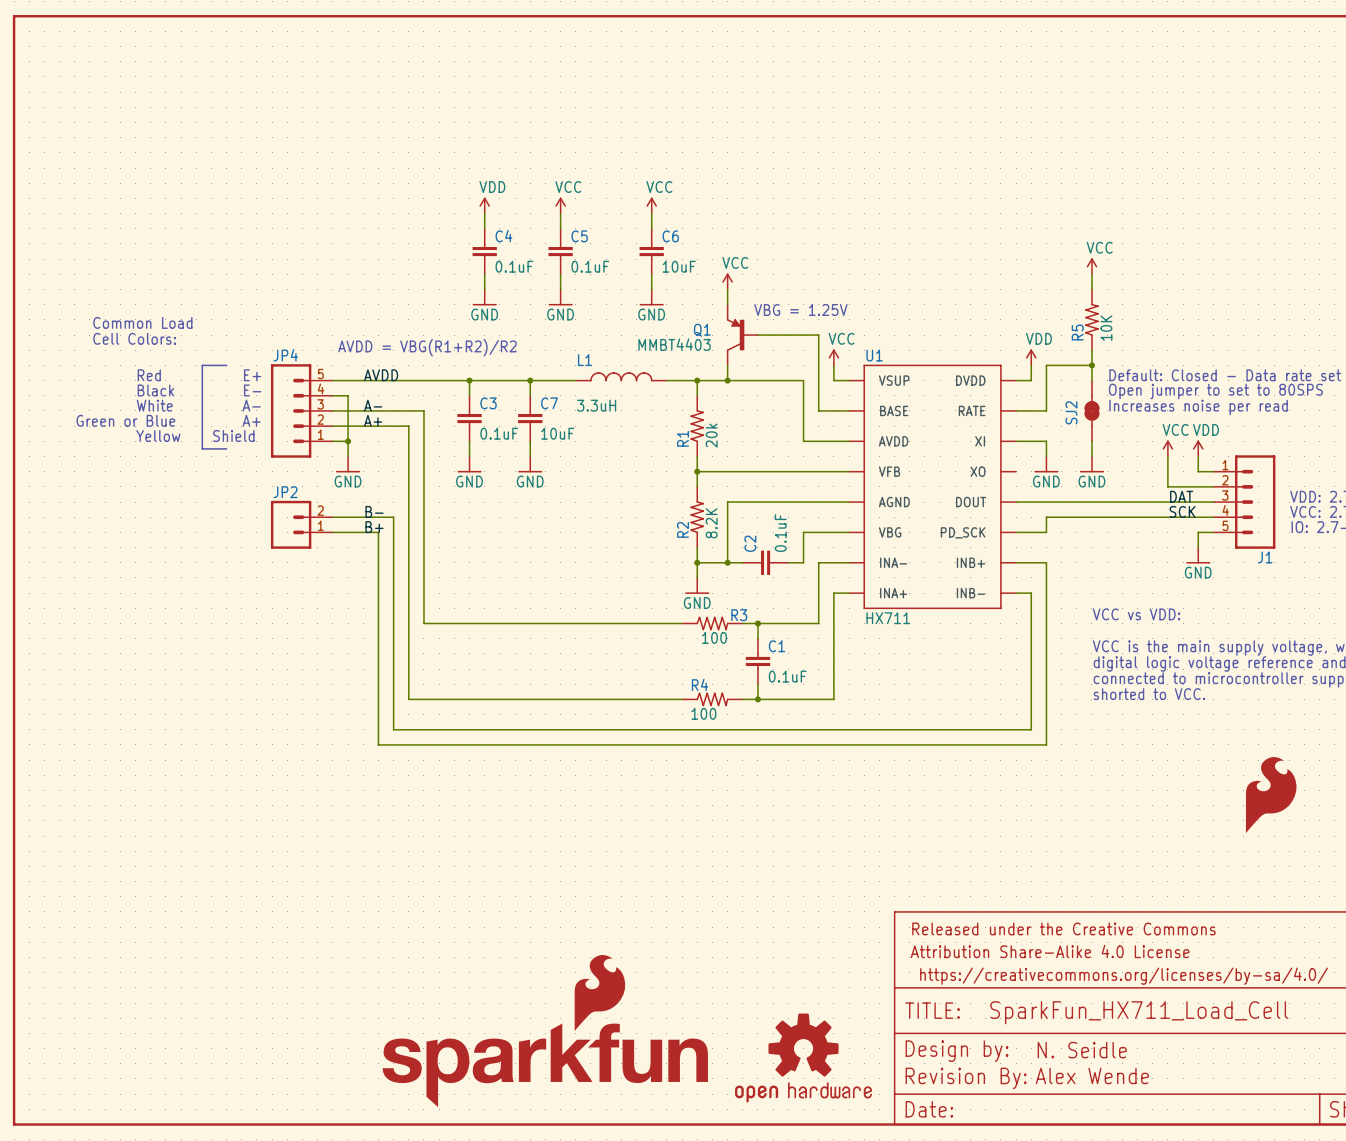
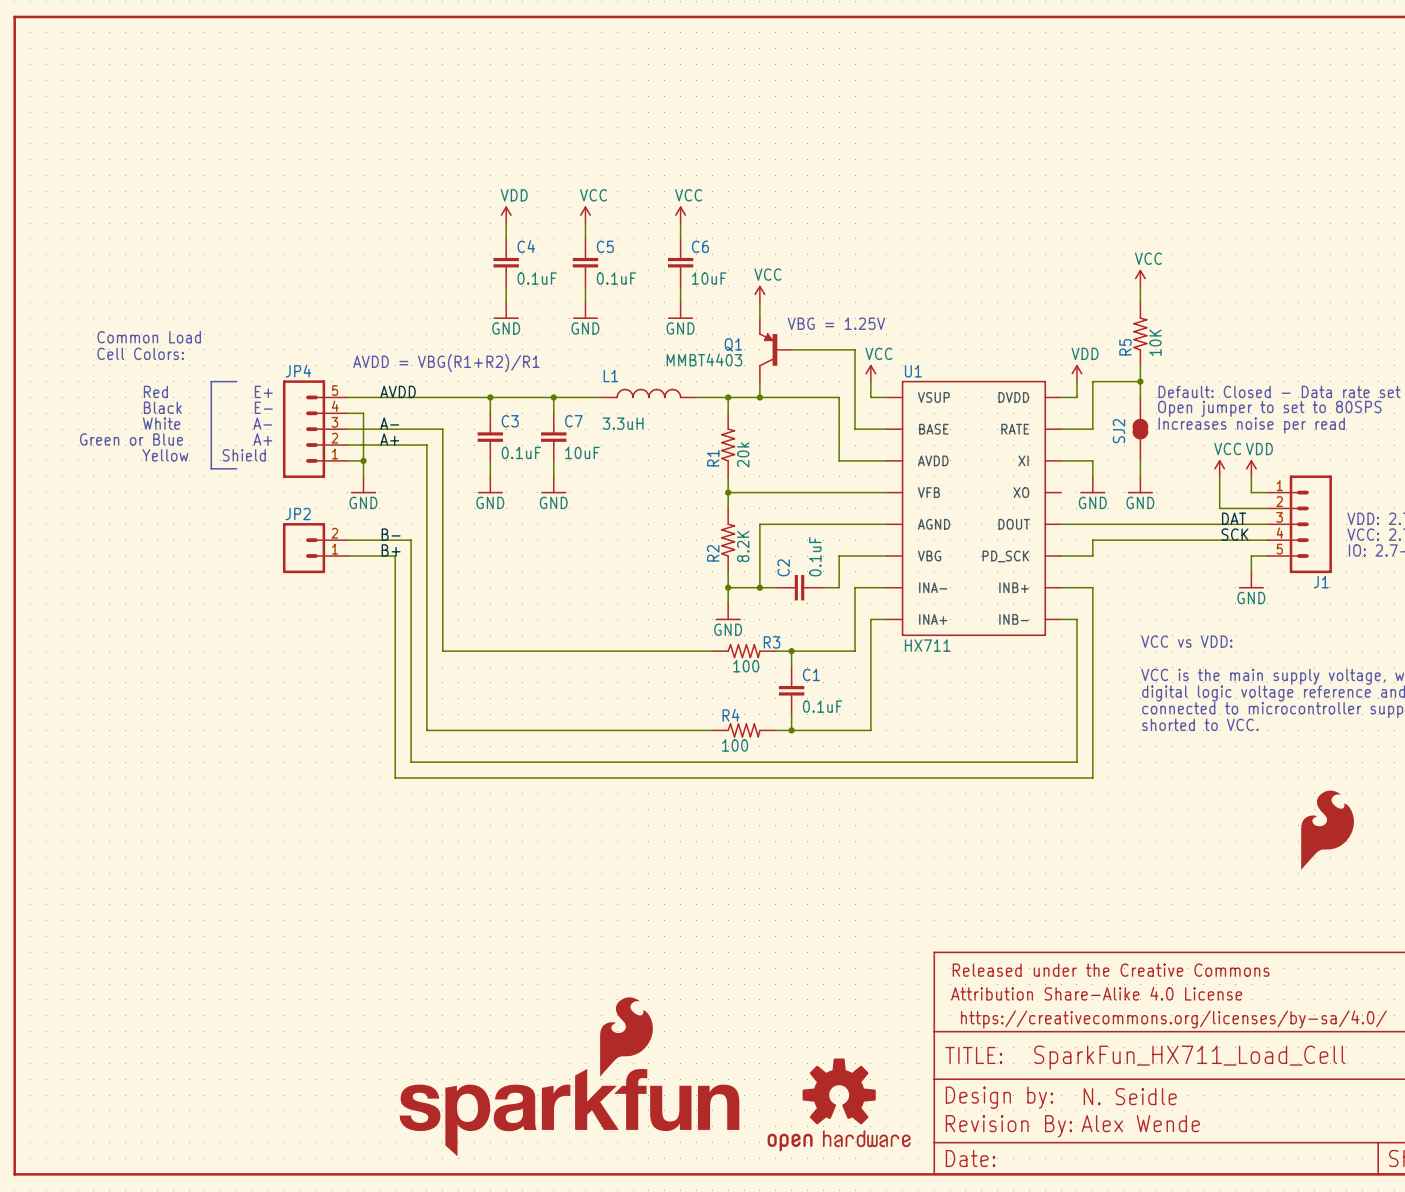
text: AVDD = VBG(R1+R2)/R2 (427, 347) -> AVDD = VBG(R1+R2)/R1 (446, 363)

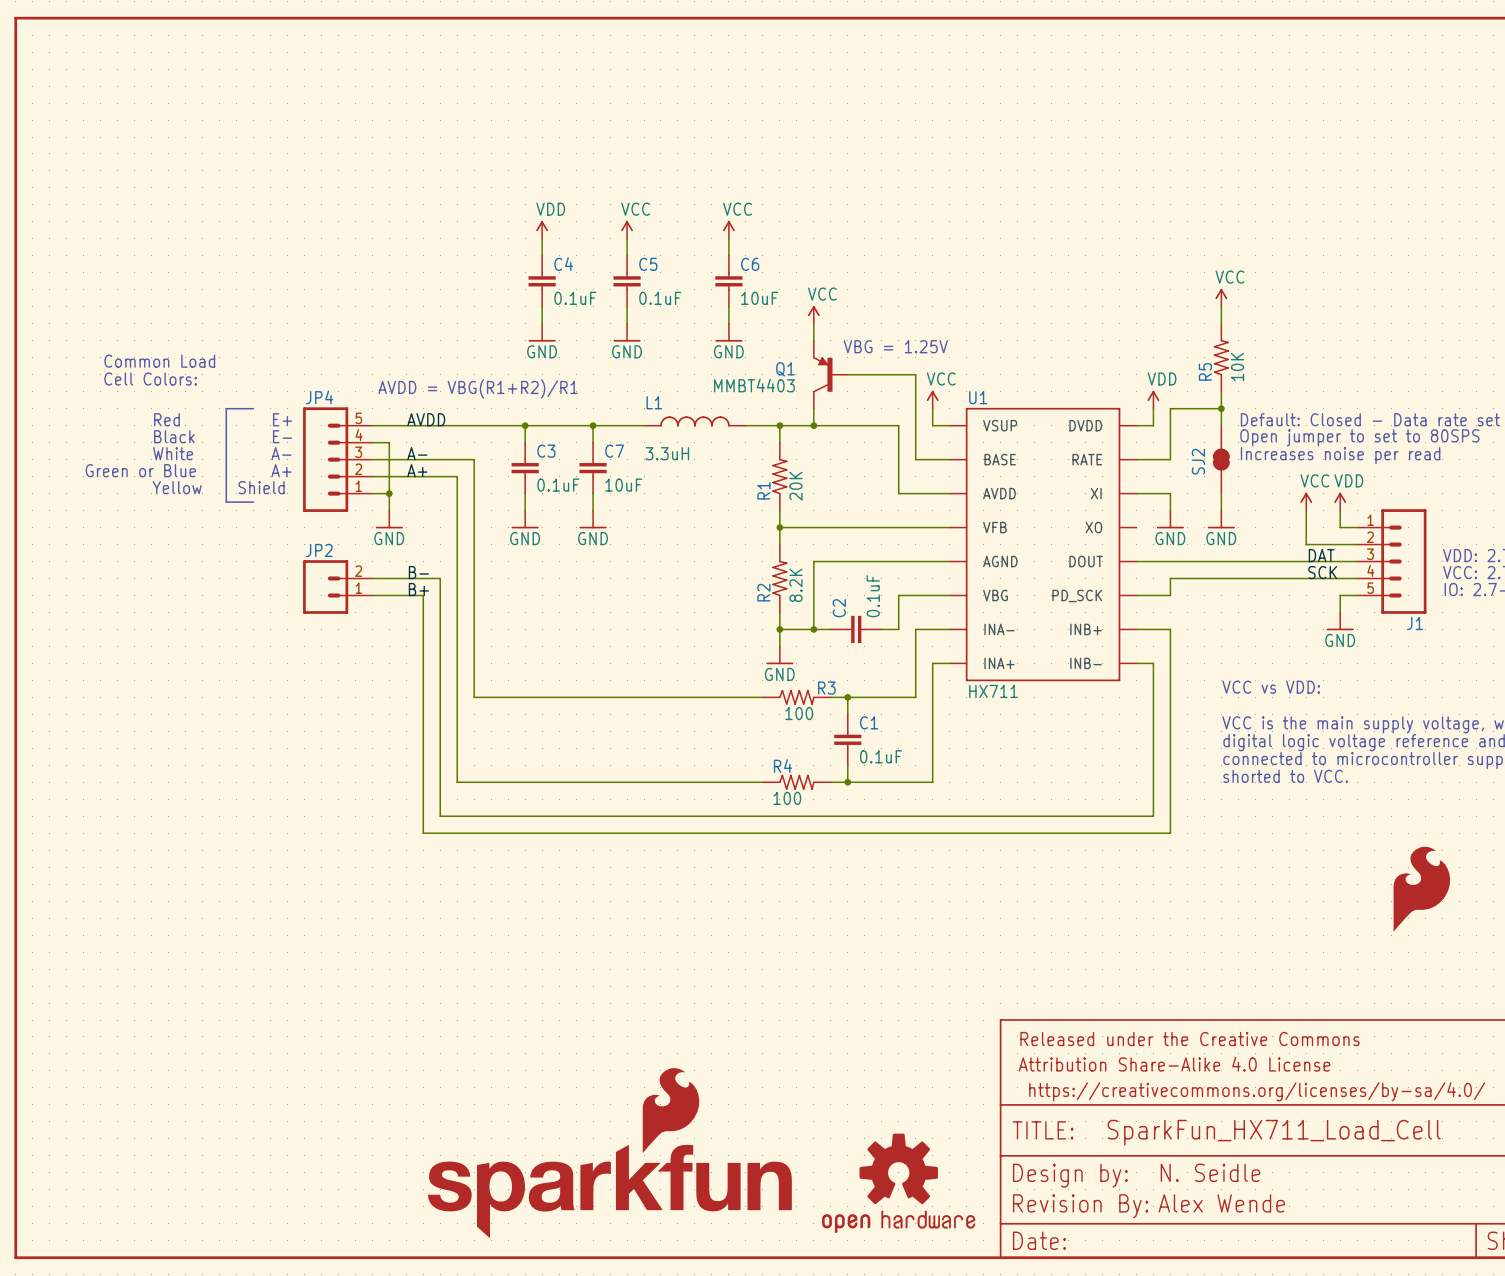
R1 value: 20k (743, 454) -> 20K (795, 486)
part text: none -> N. Seidle (1210, 1172)
text: N. Seidle (1130, 1096) -> none

